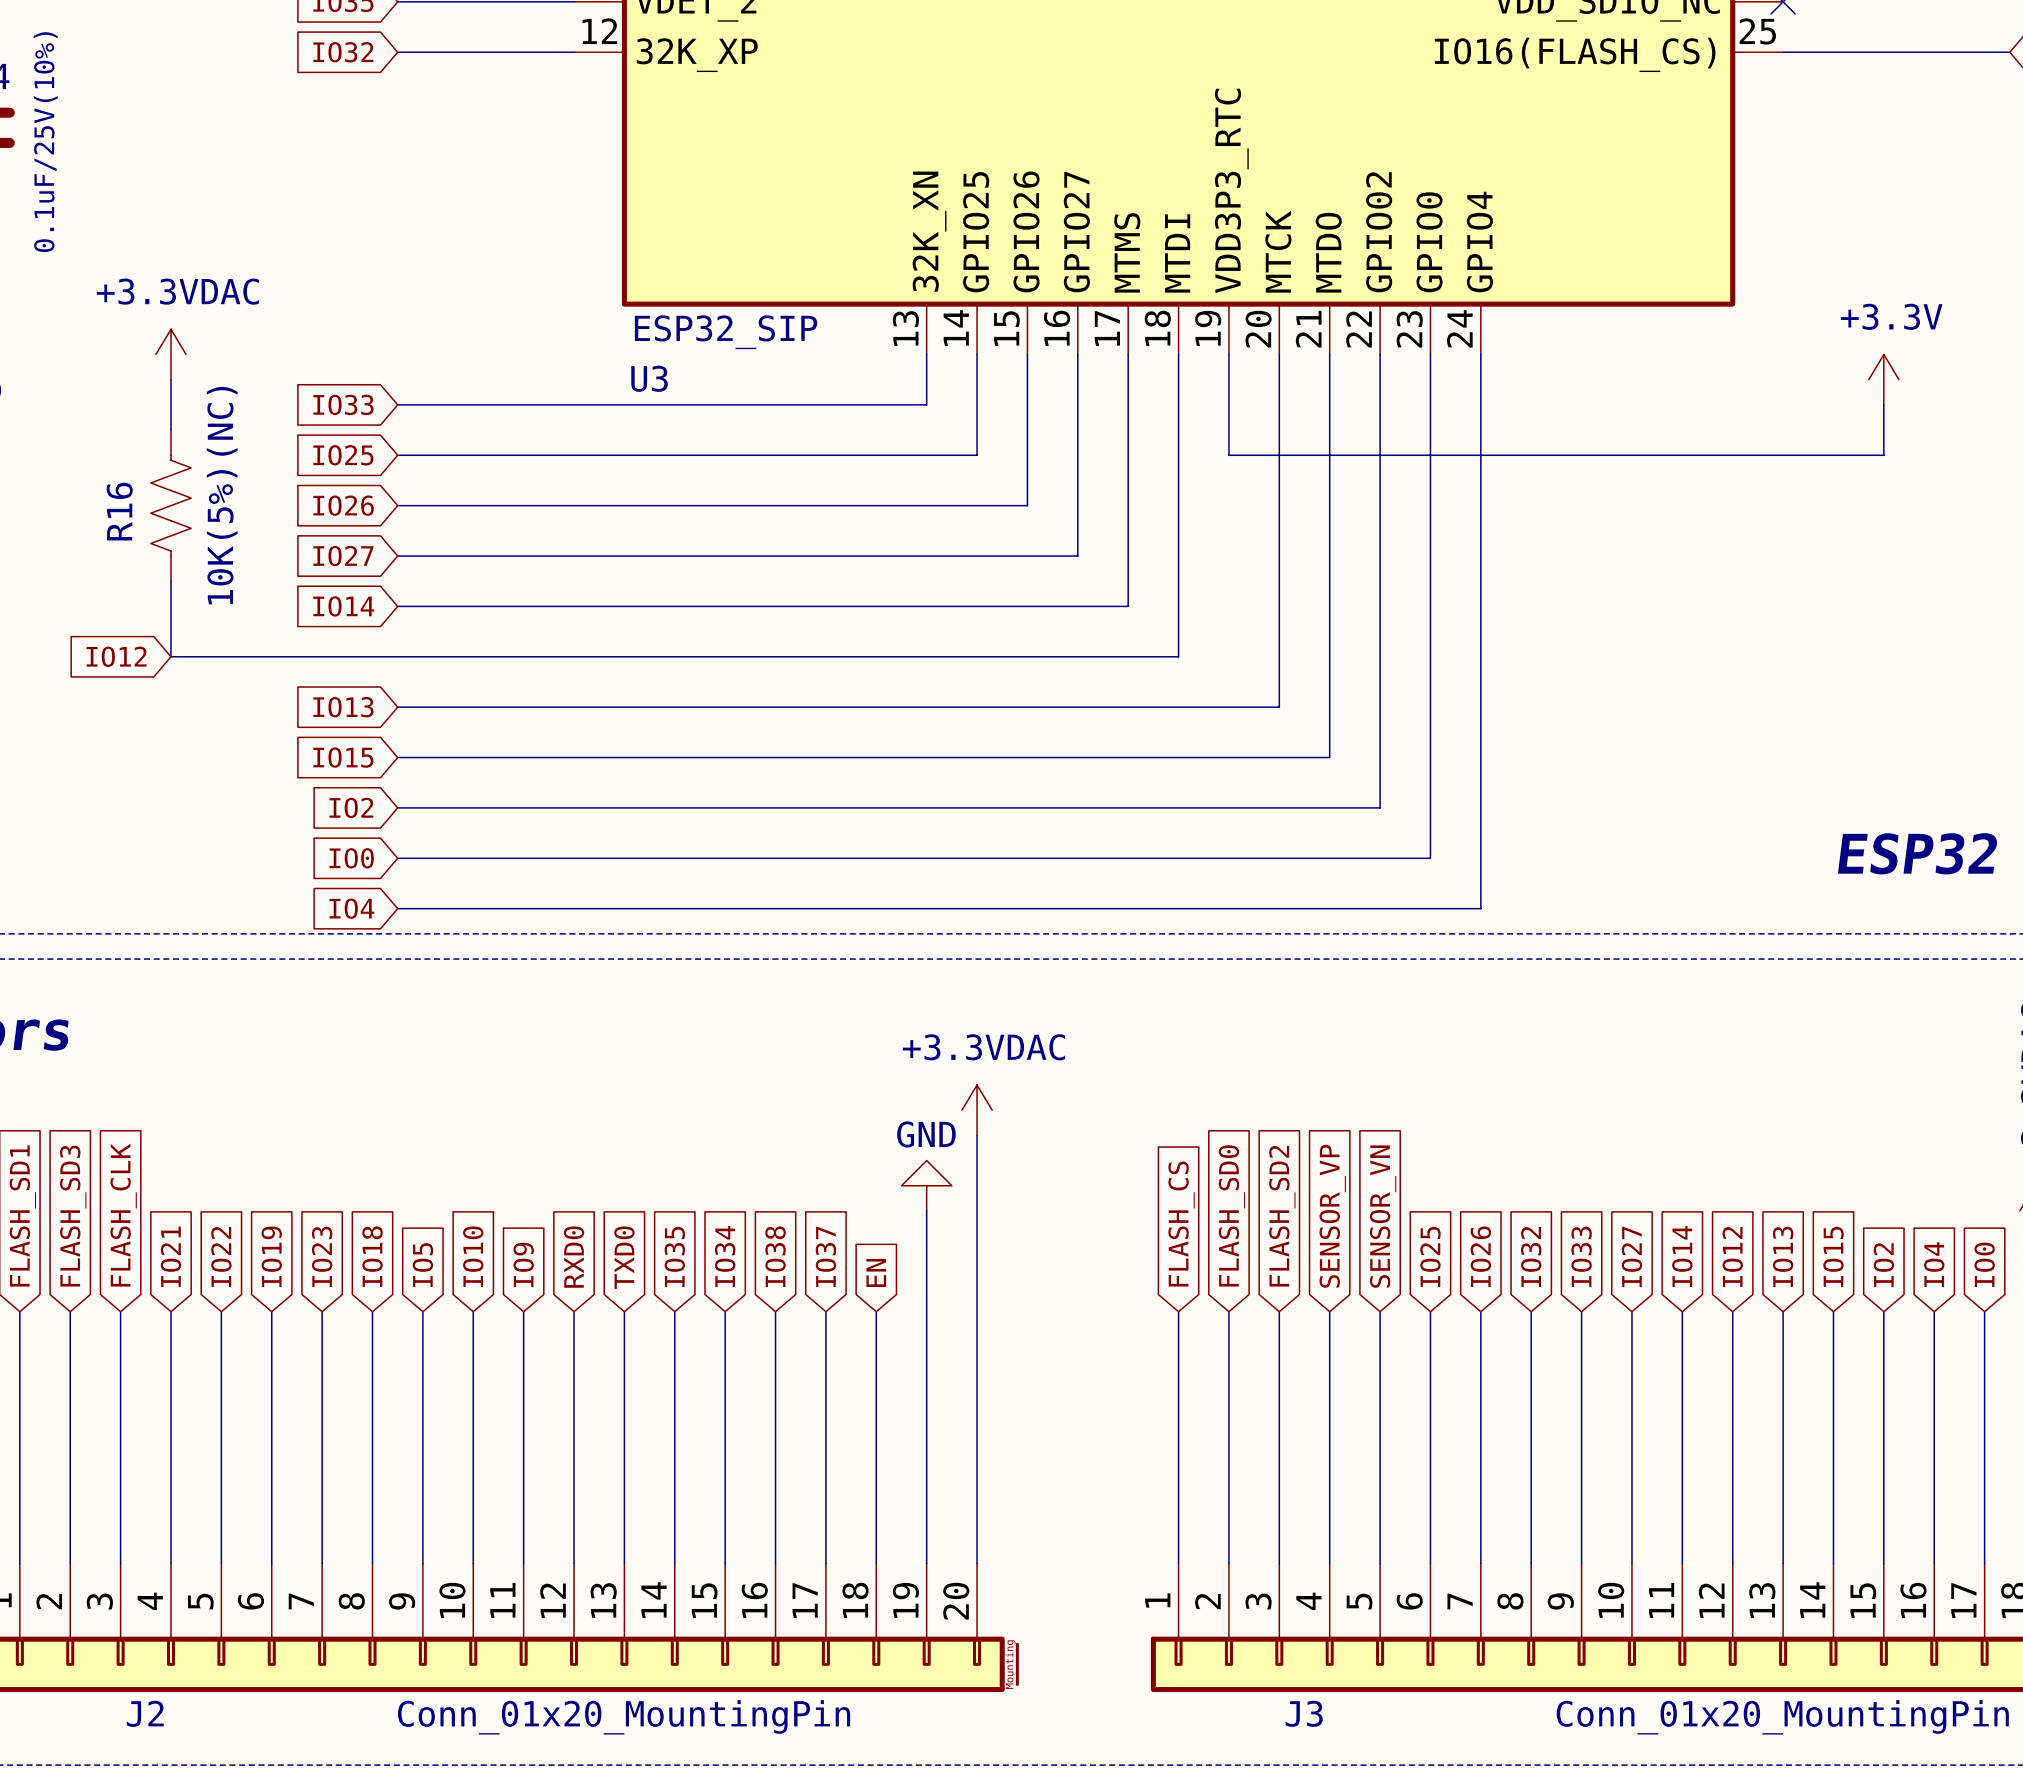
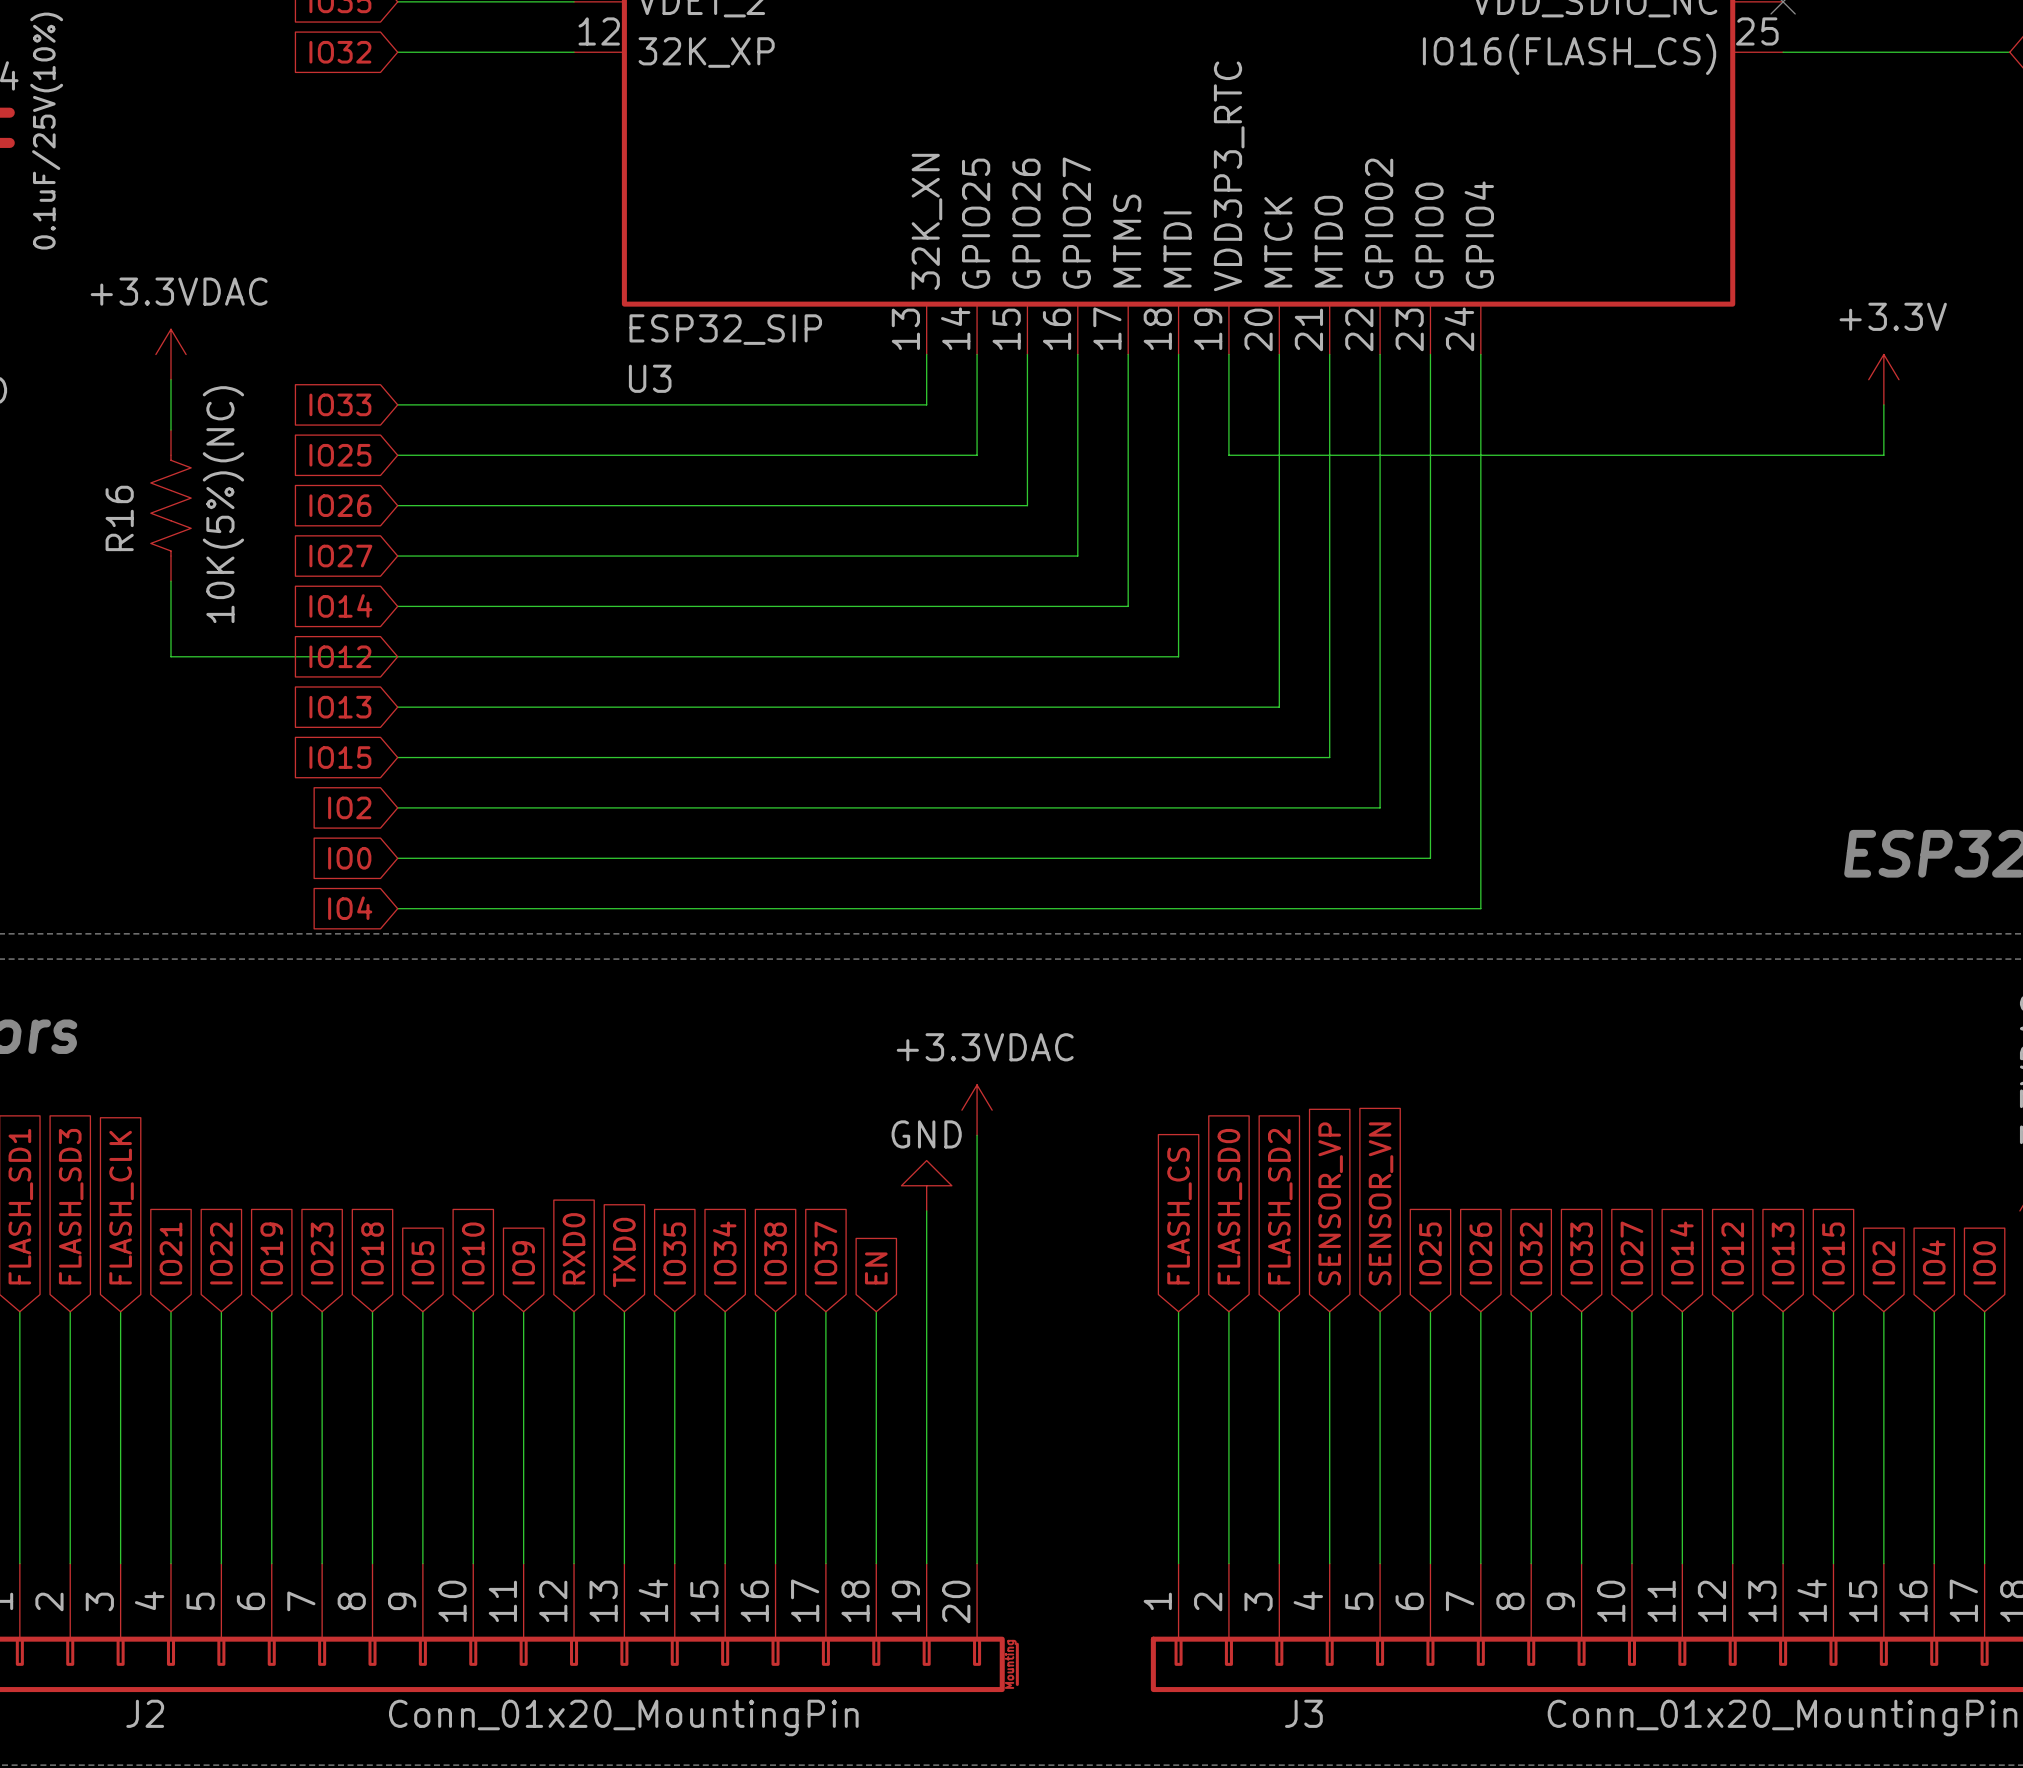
global label position: IO12 (116, 656) -> IO12 (340, 656)

